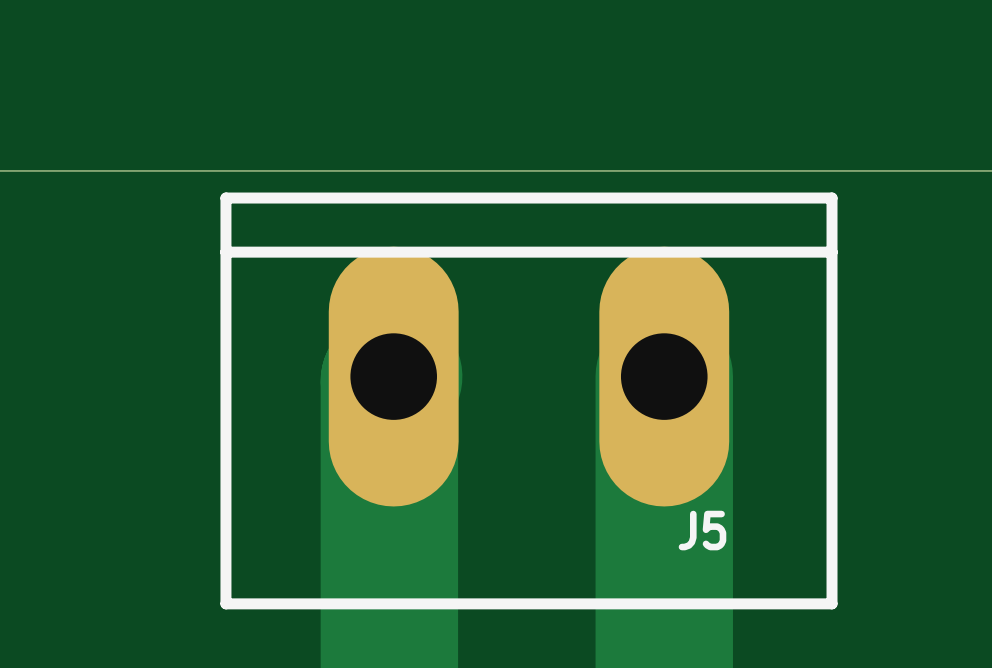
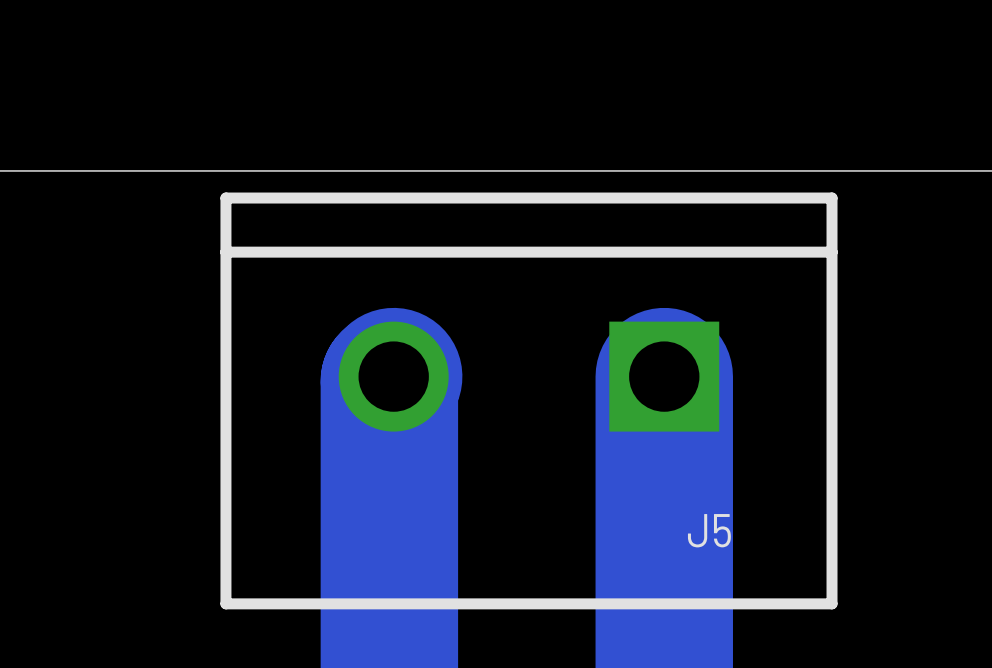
J5 footprint: [220, 192, 838, 610] -> [220, 192, 838, 610]

